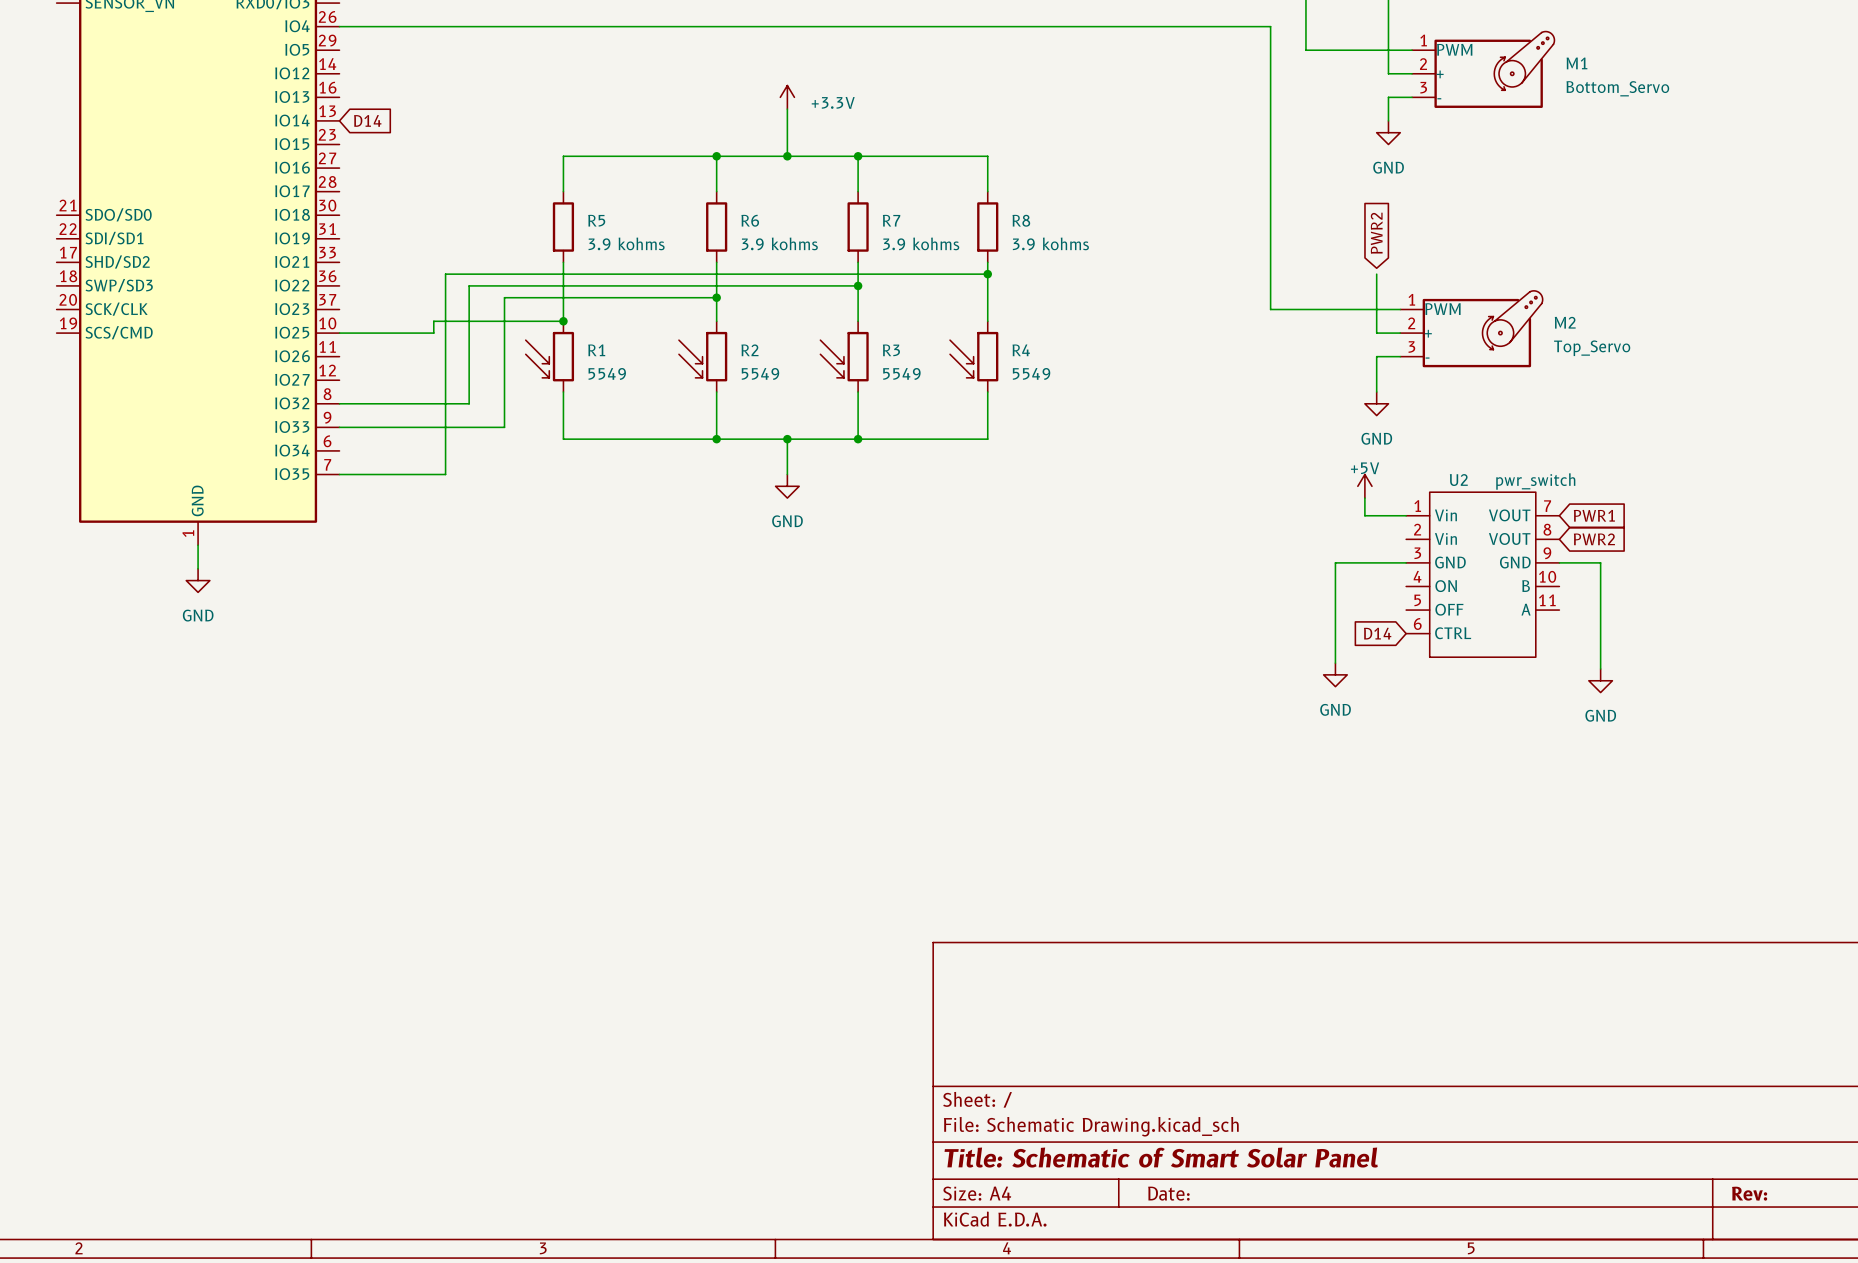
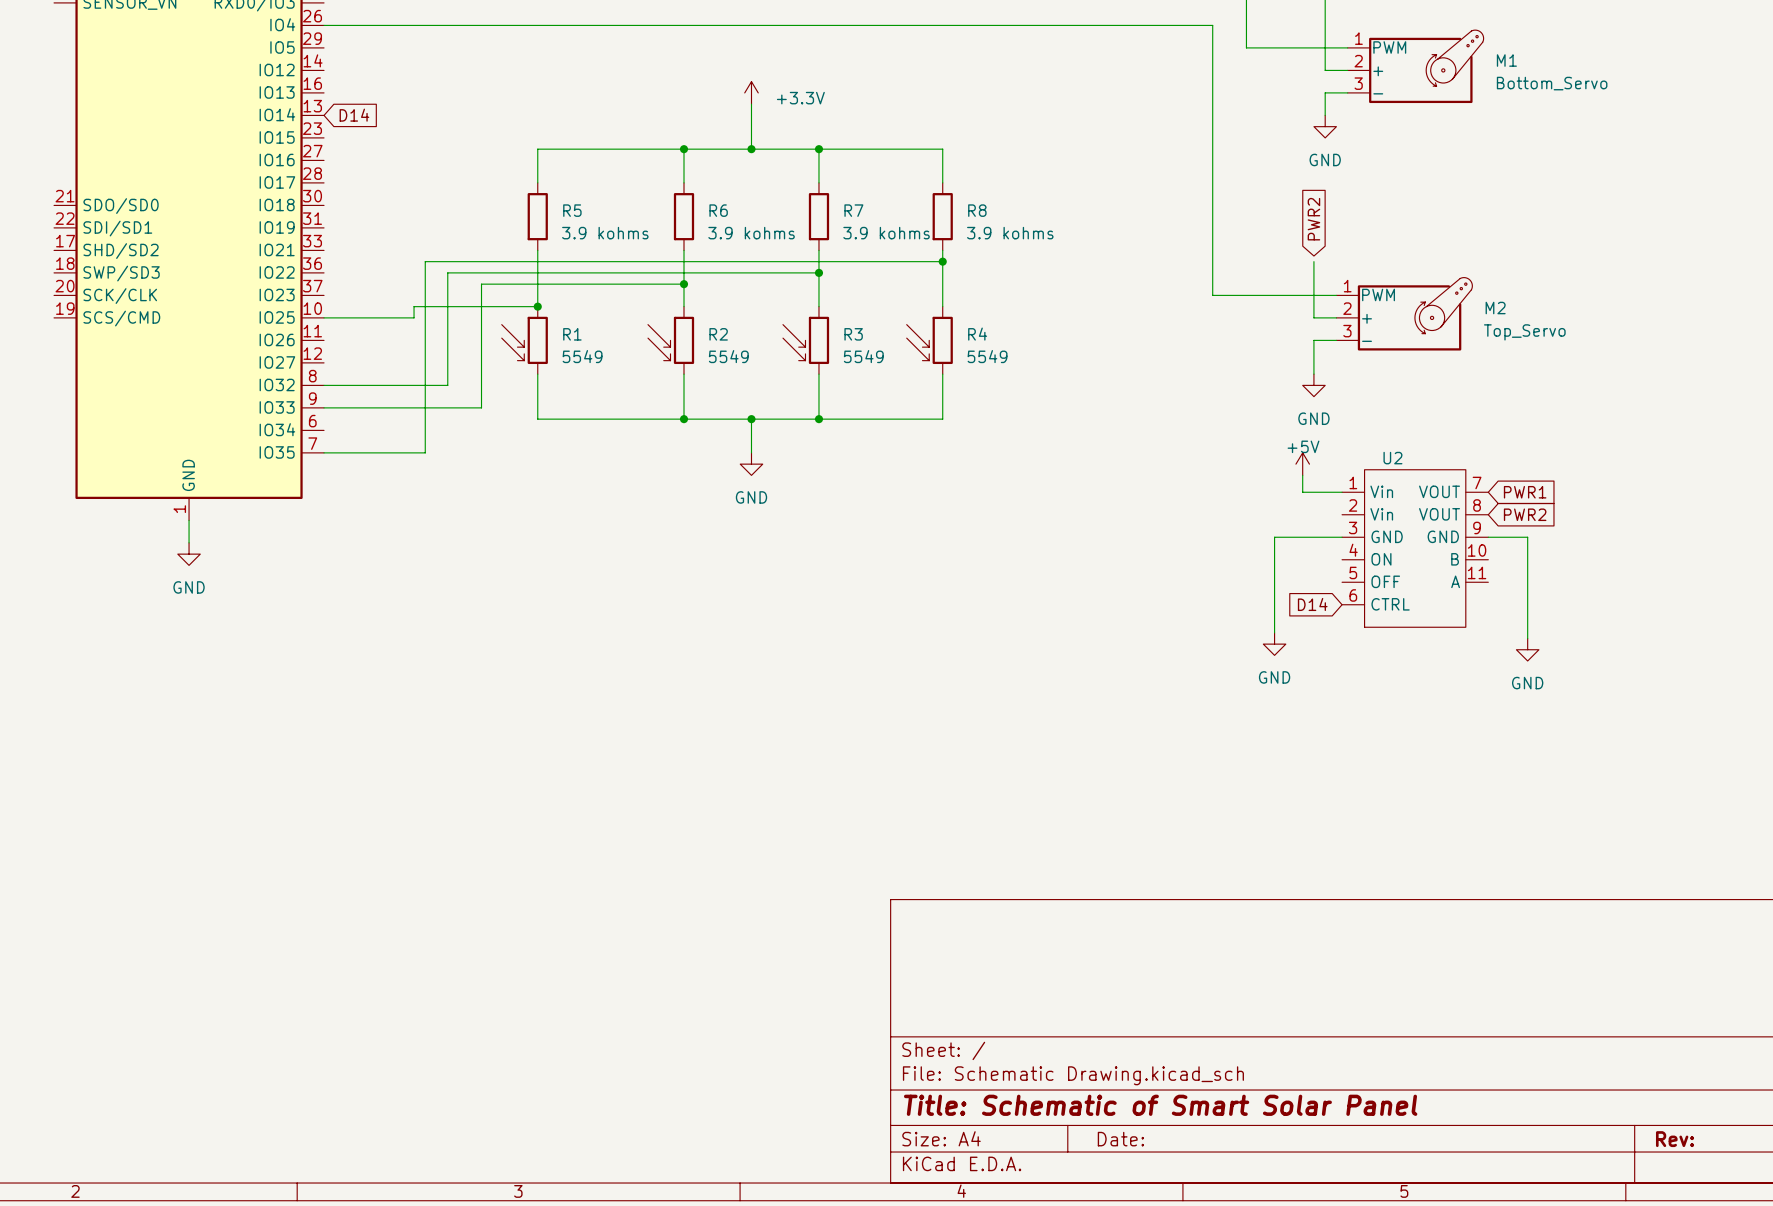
U2 value: pwr_switch (1535, 481) -> none

